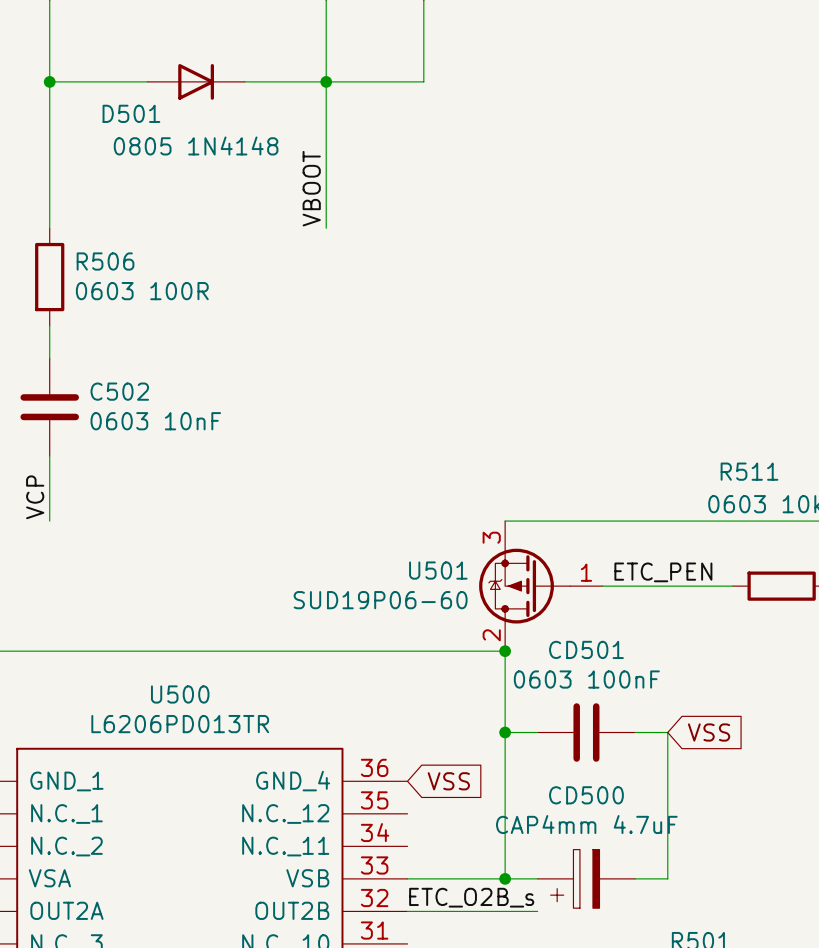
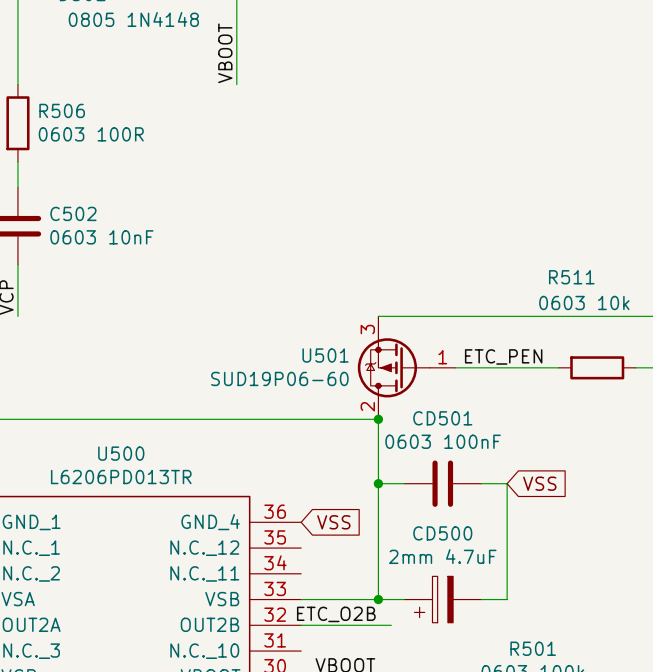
CD500 value: CAP4mm 4.7uF (586, 824) -> 2mm 4.7uF (442, 556)
label: ETC_O2B_s (471, 897) -> ETC_O2B (336, 614)
wire: (521, 911) (537, 911) -> none

